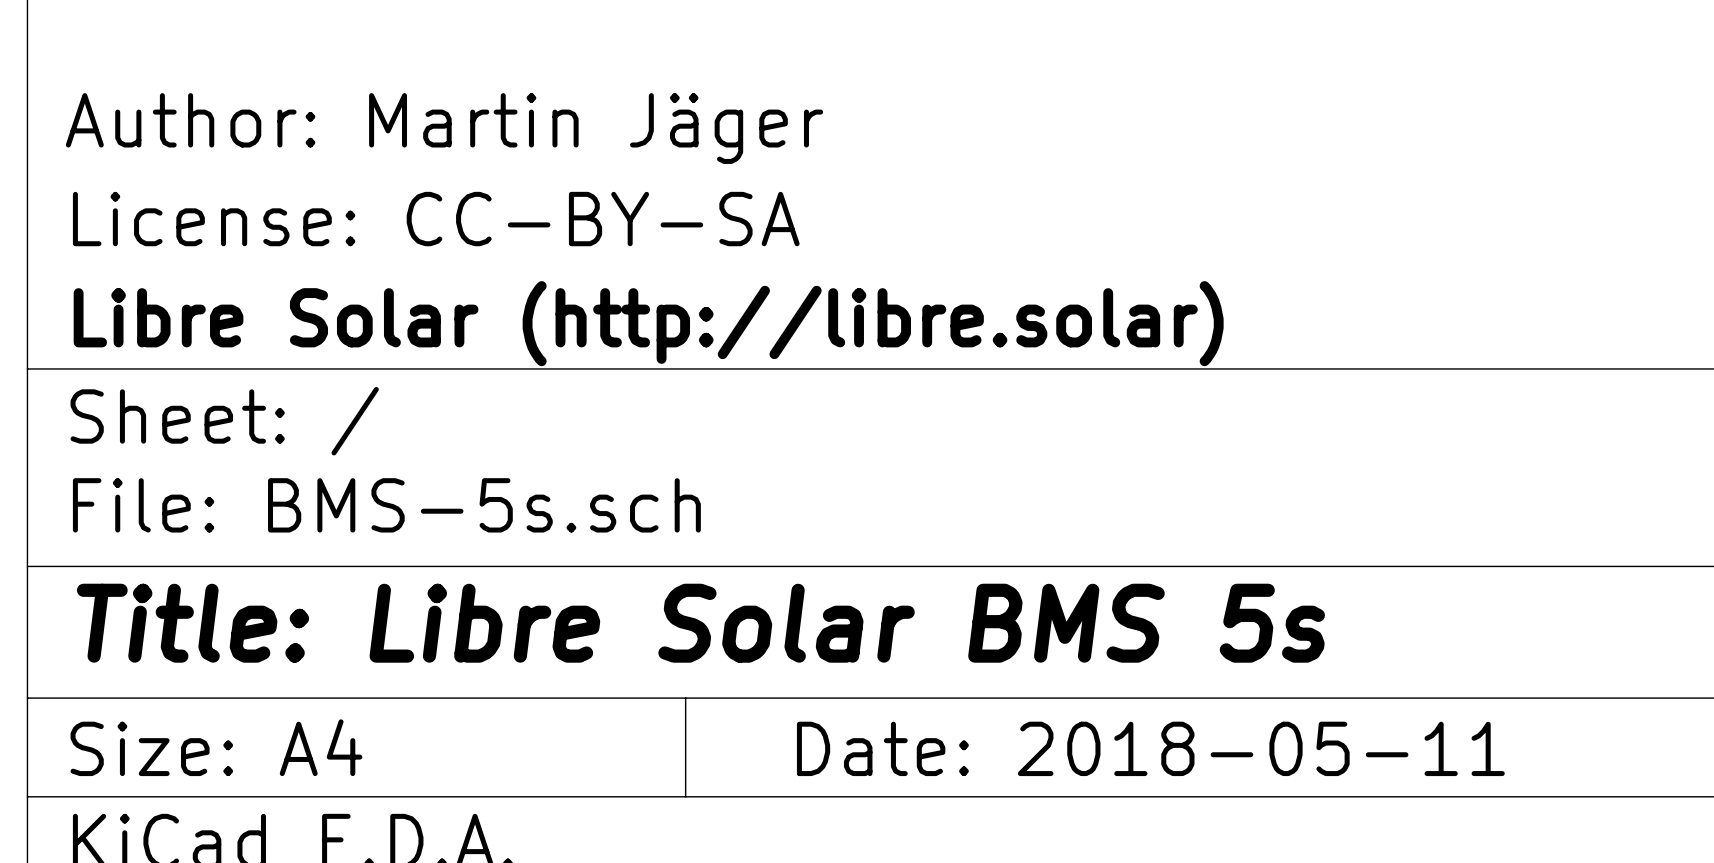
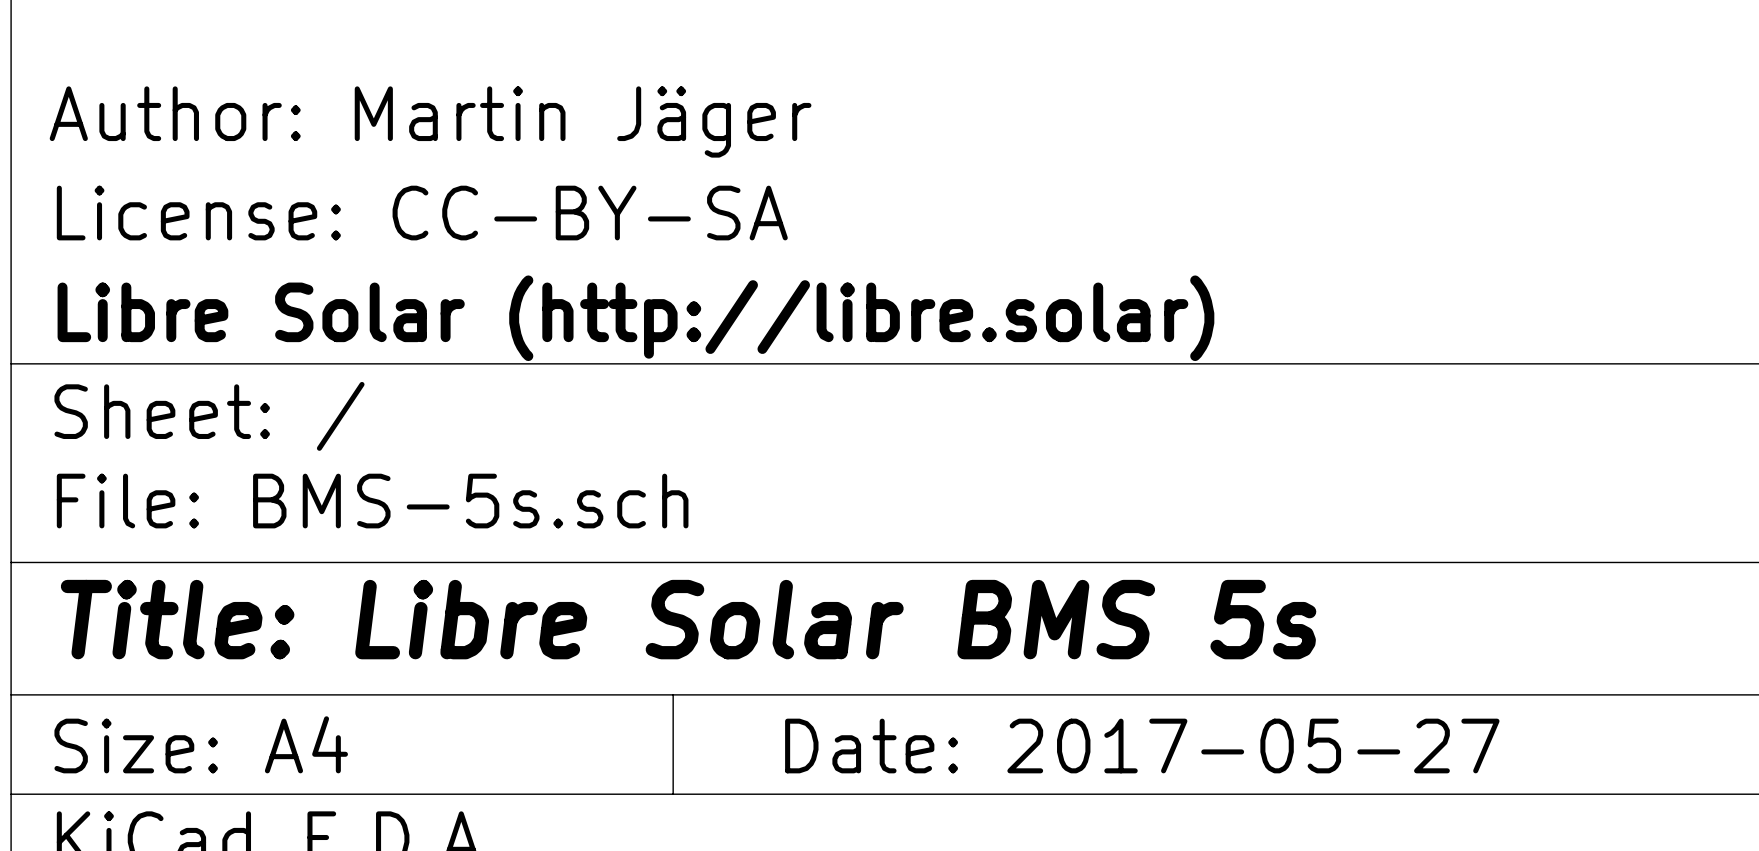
title block: Date: 2018-05-11 (1150, 748) -> Date: 2017-05-27 (1142, 746)

